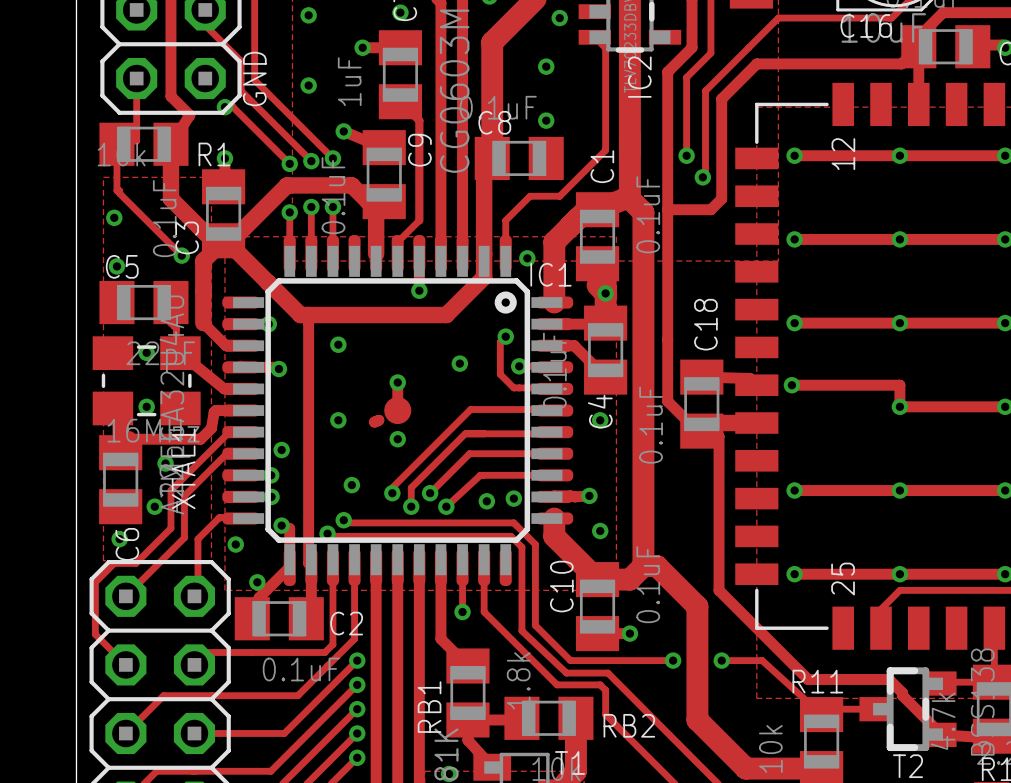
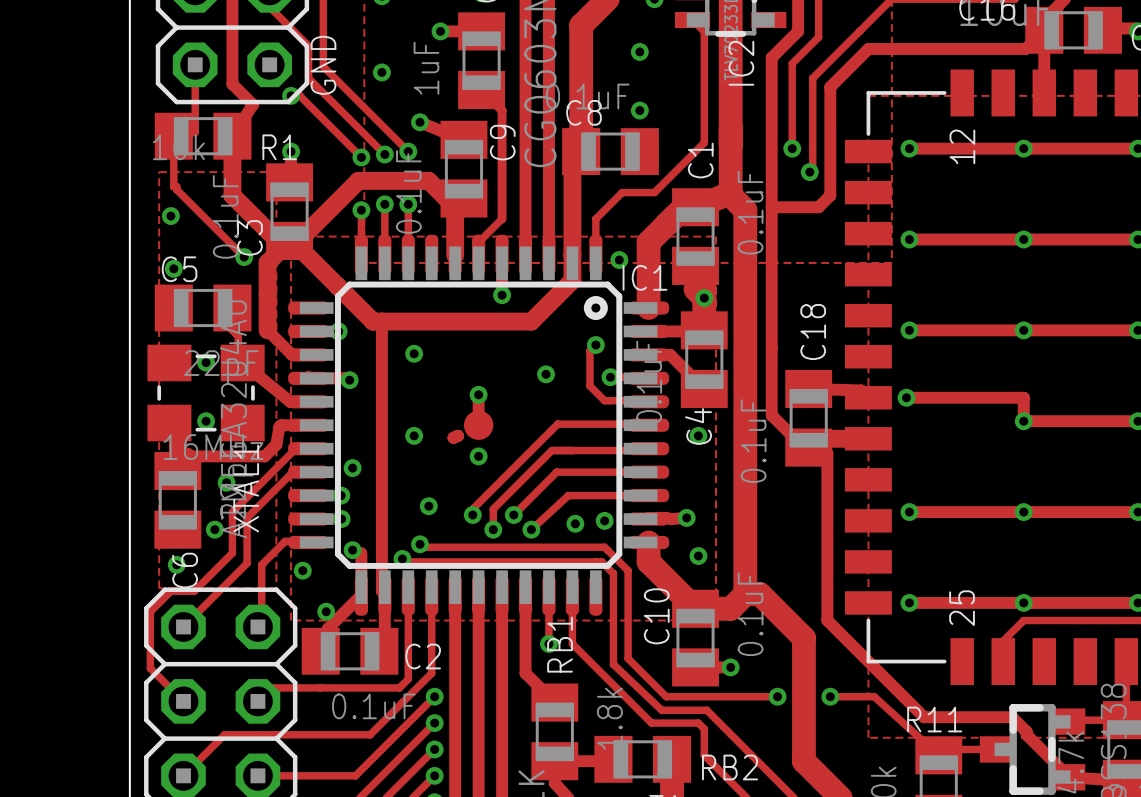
RB1 name position: RB1 (429, 707) -> RB1 (560, 644)

